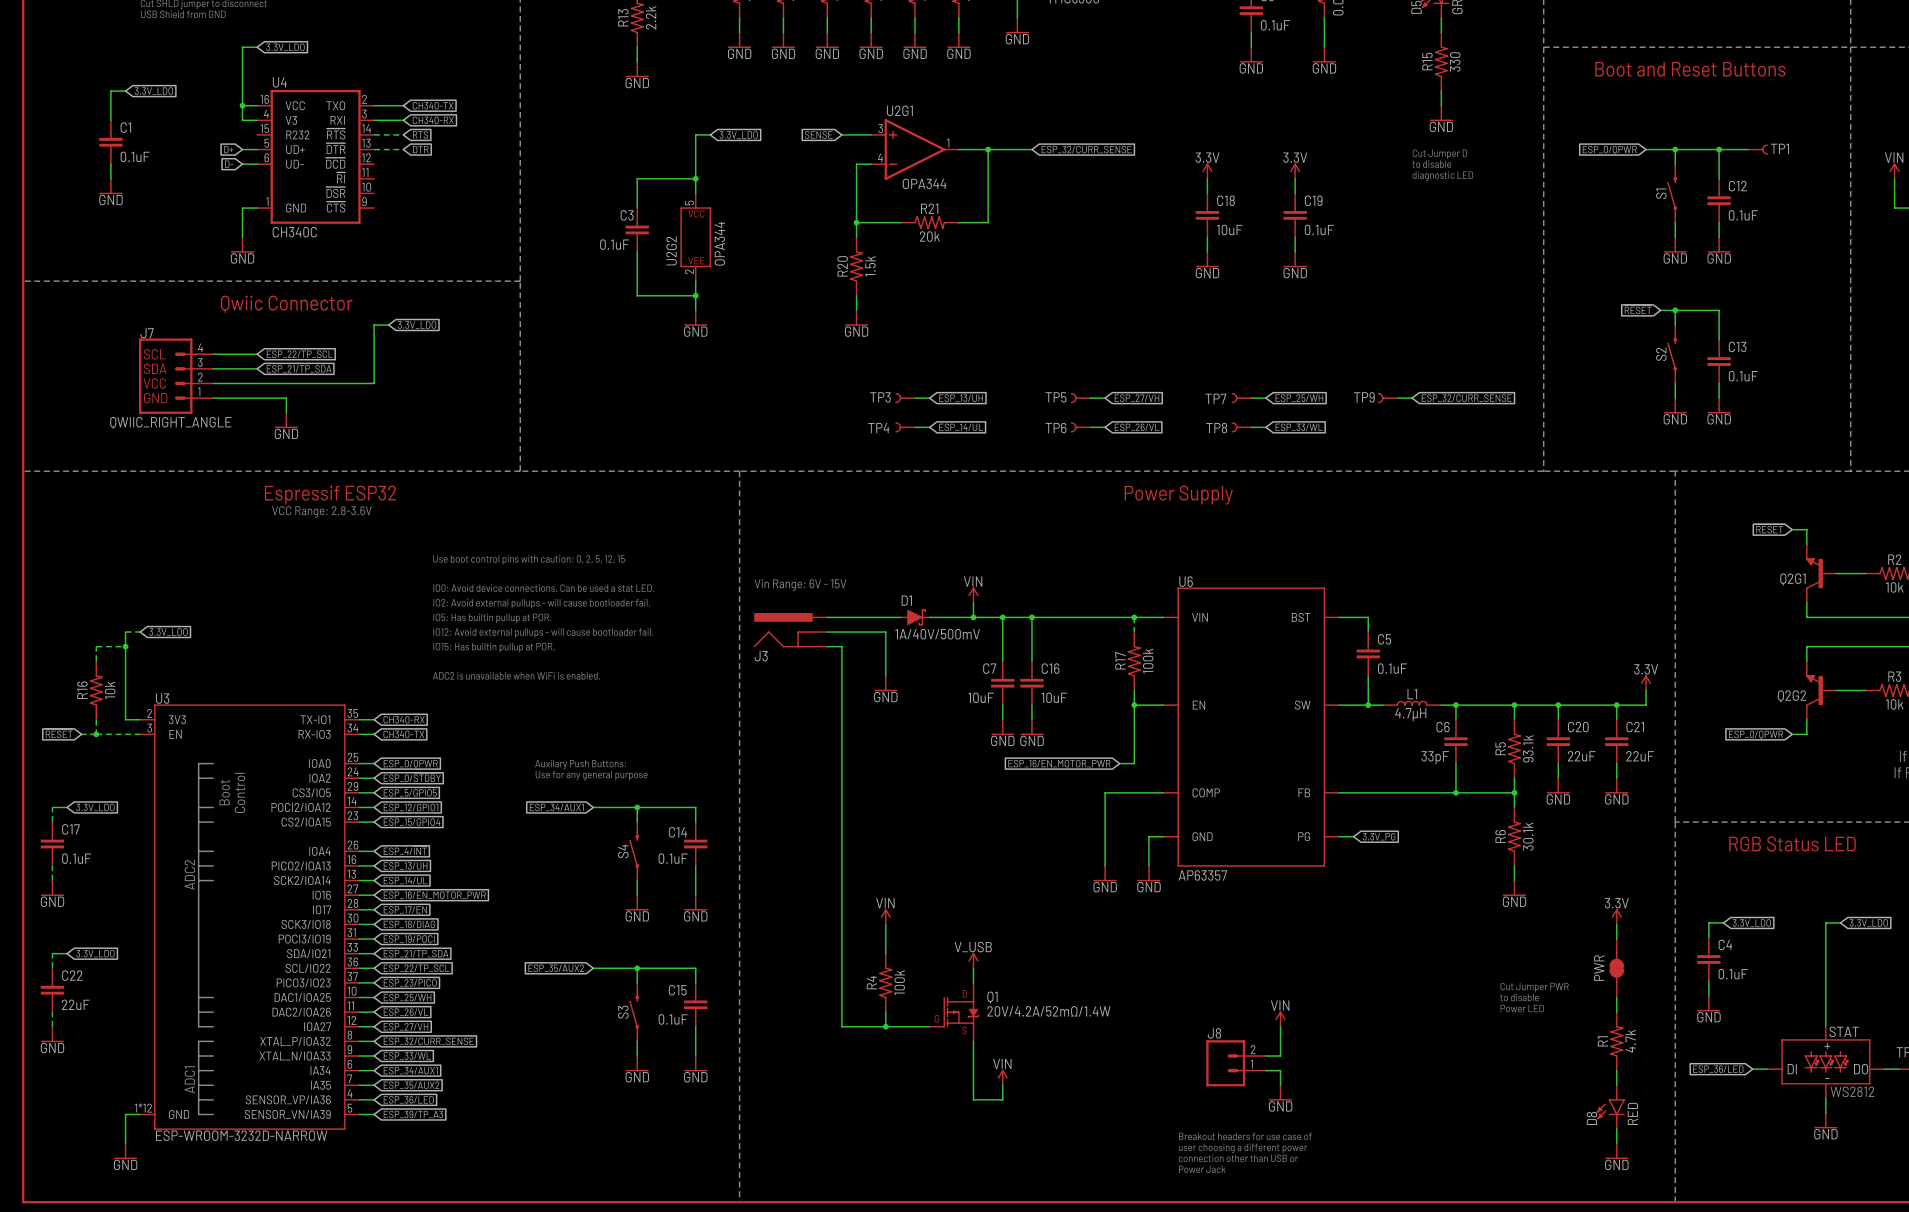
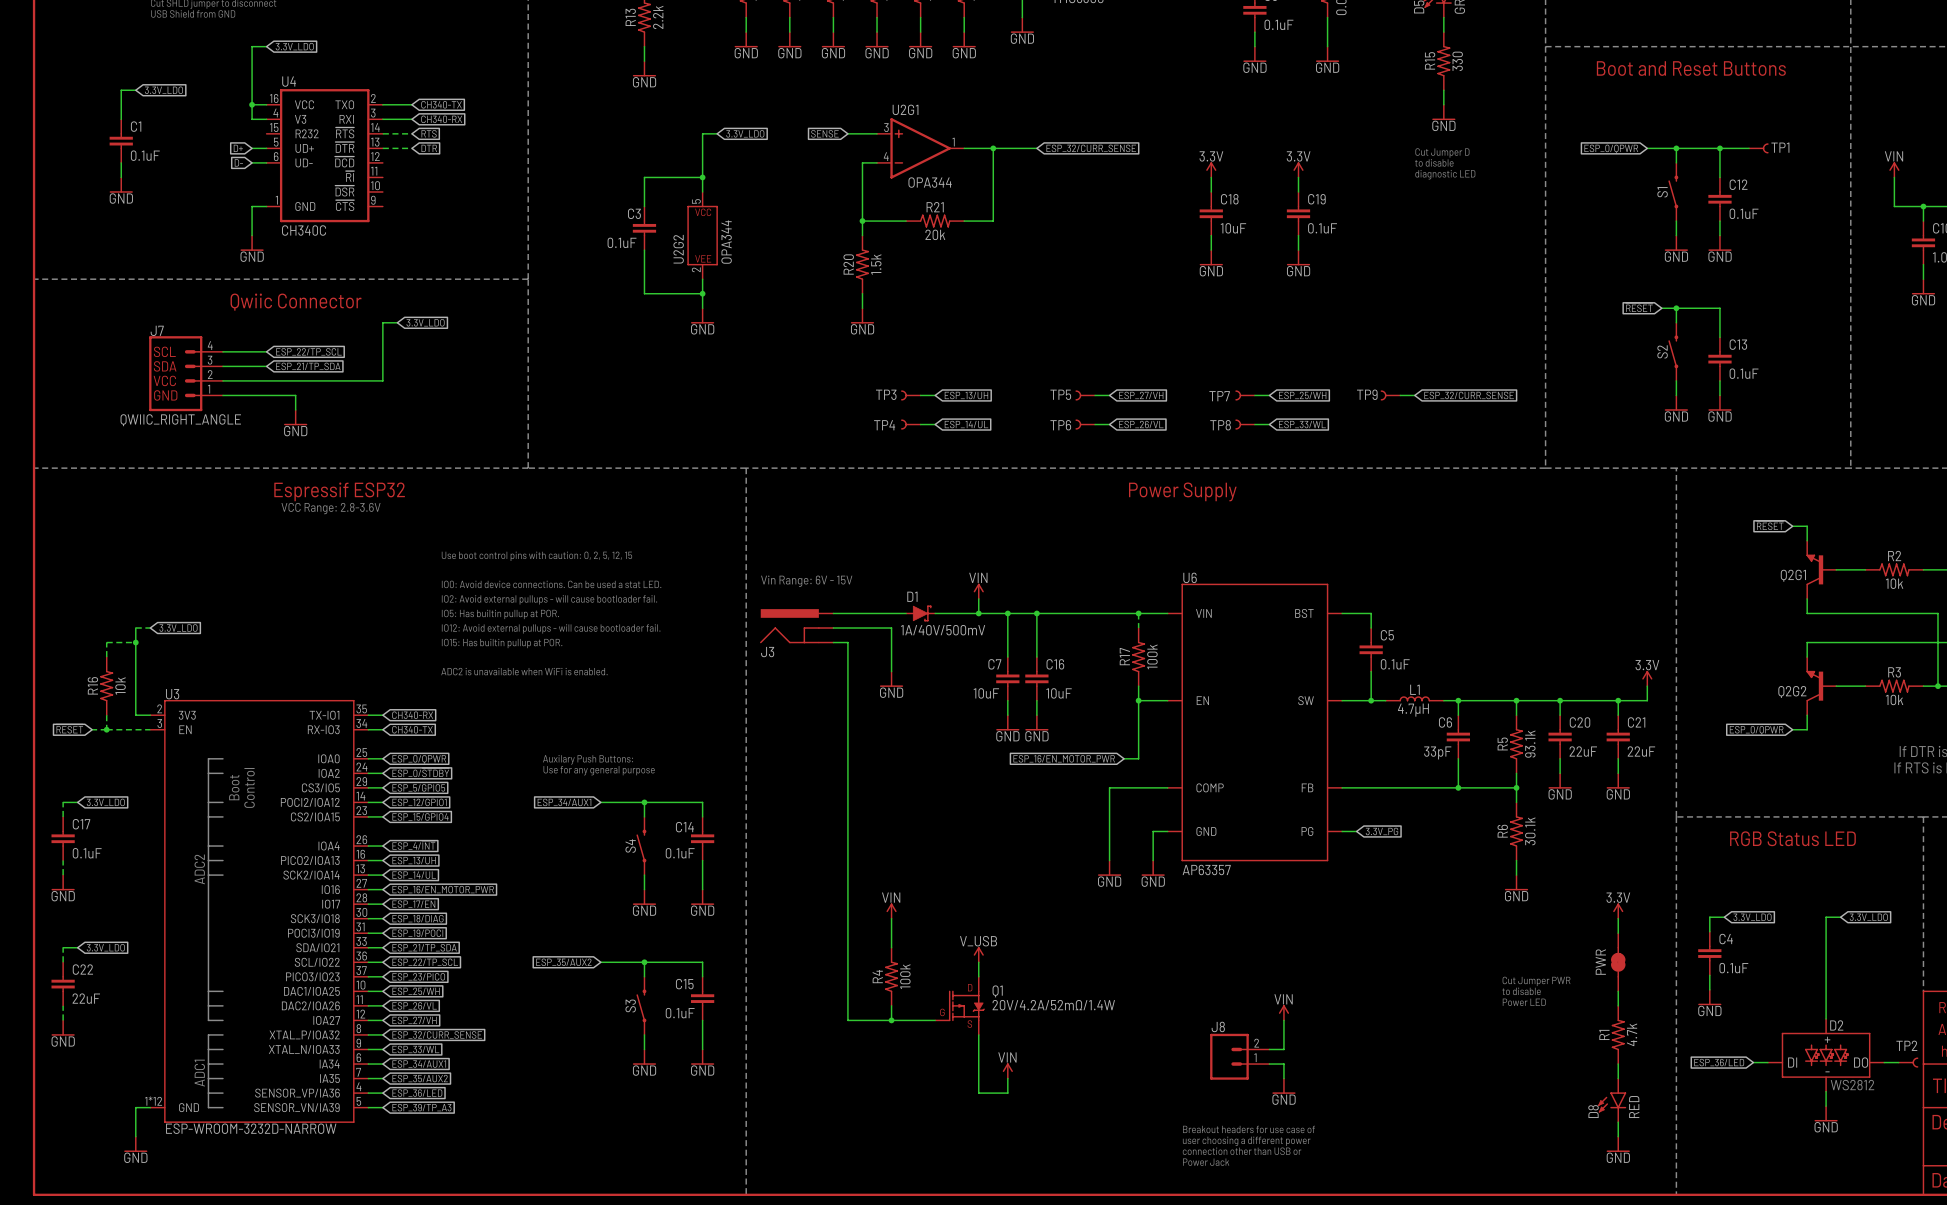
STAT name: STAT (1844, 1031) -> D2 (1836, 1025)

